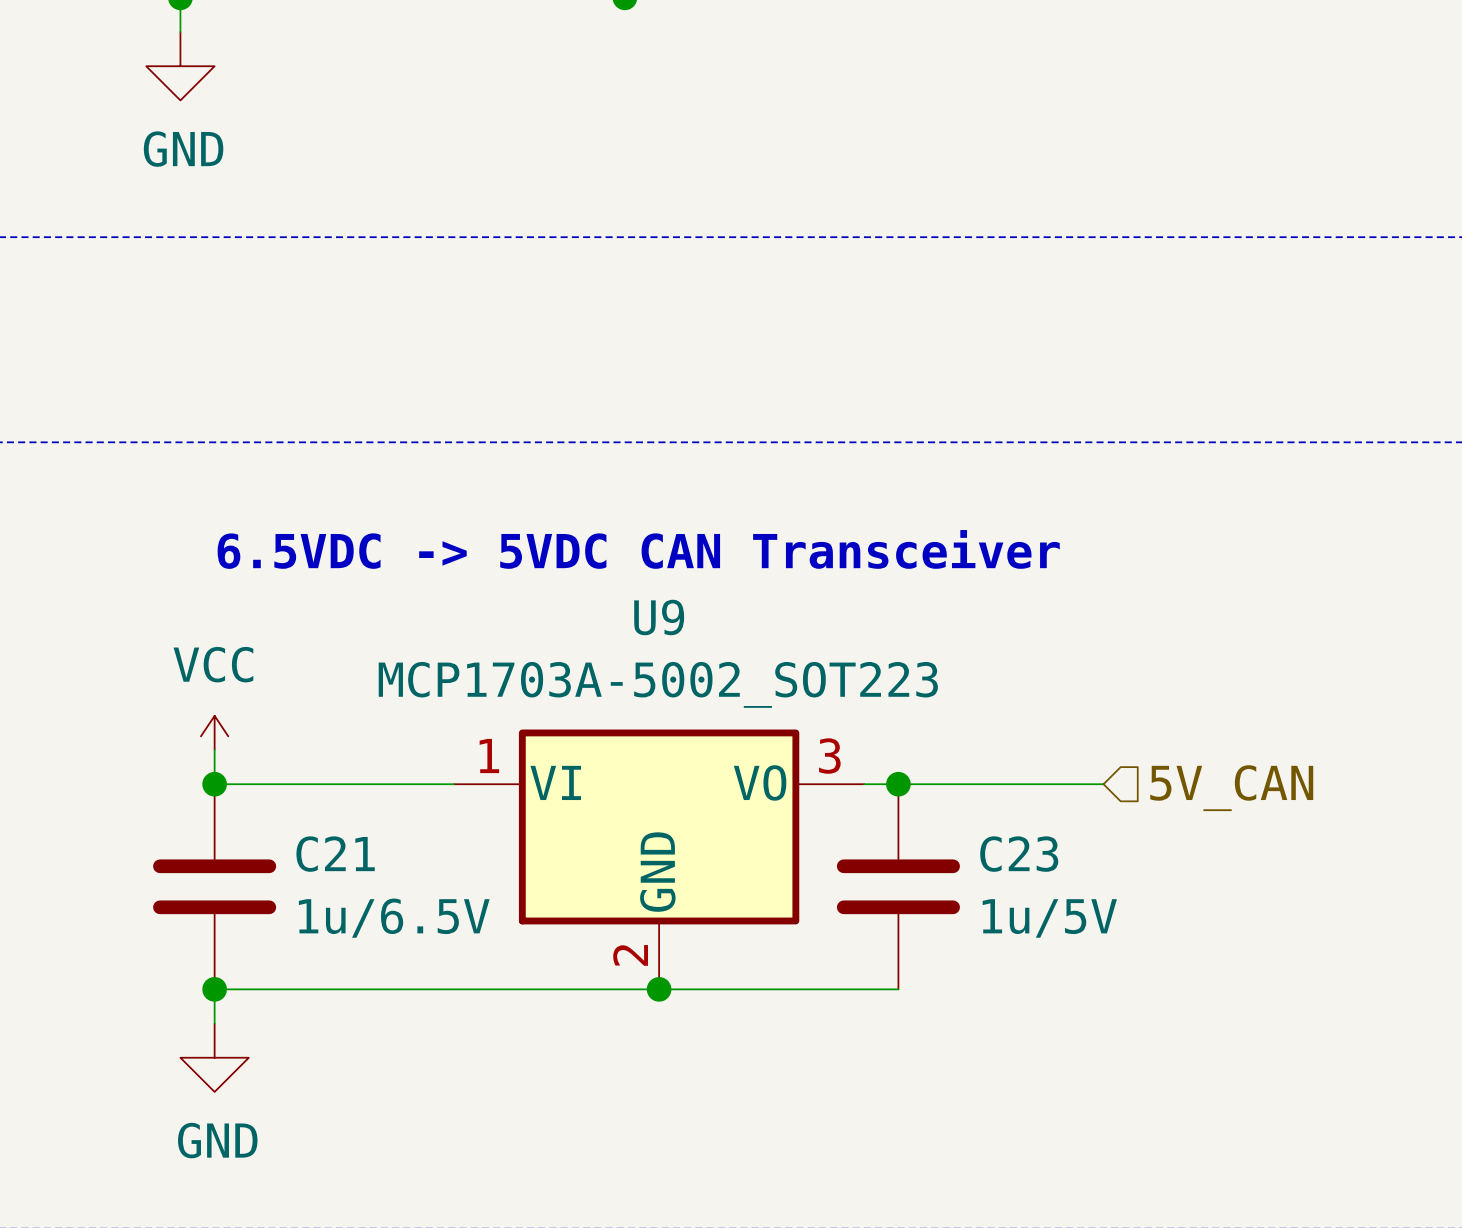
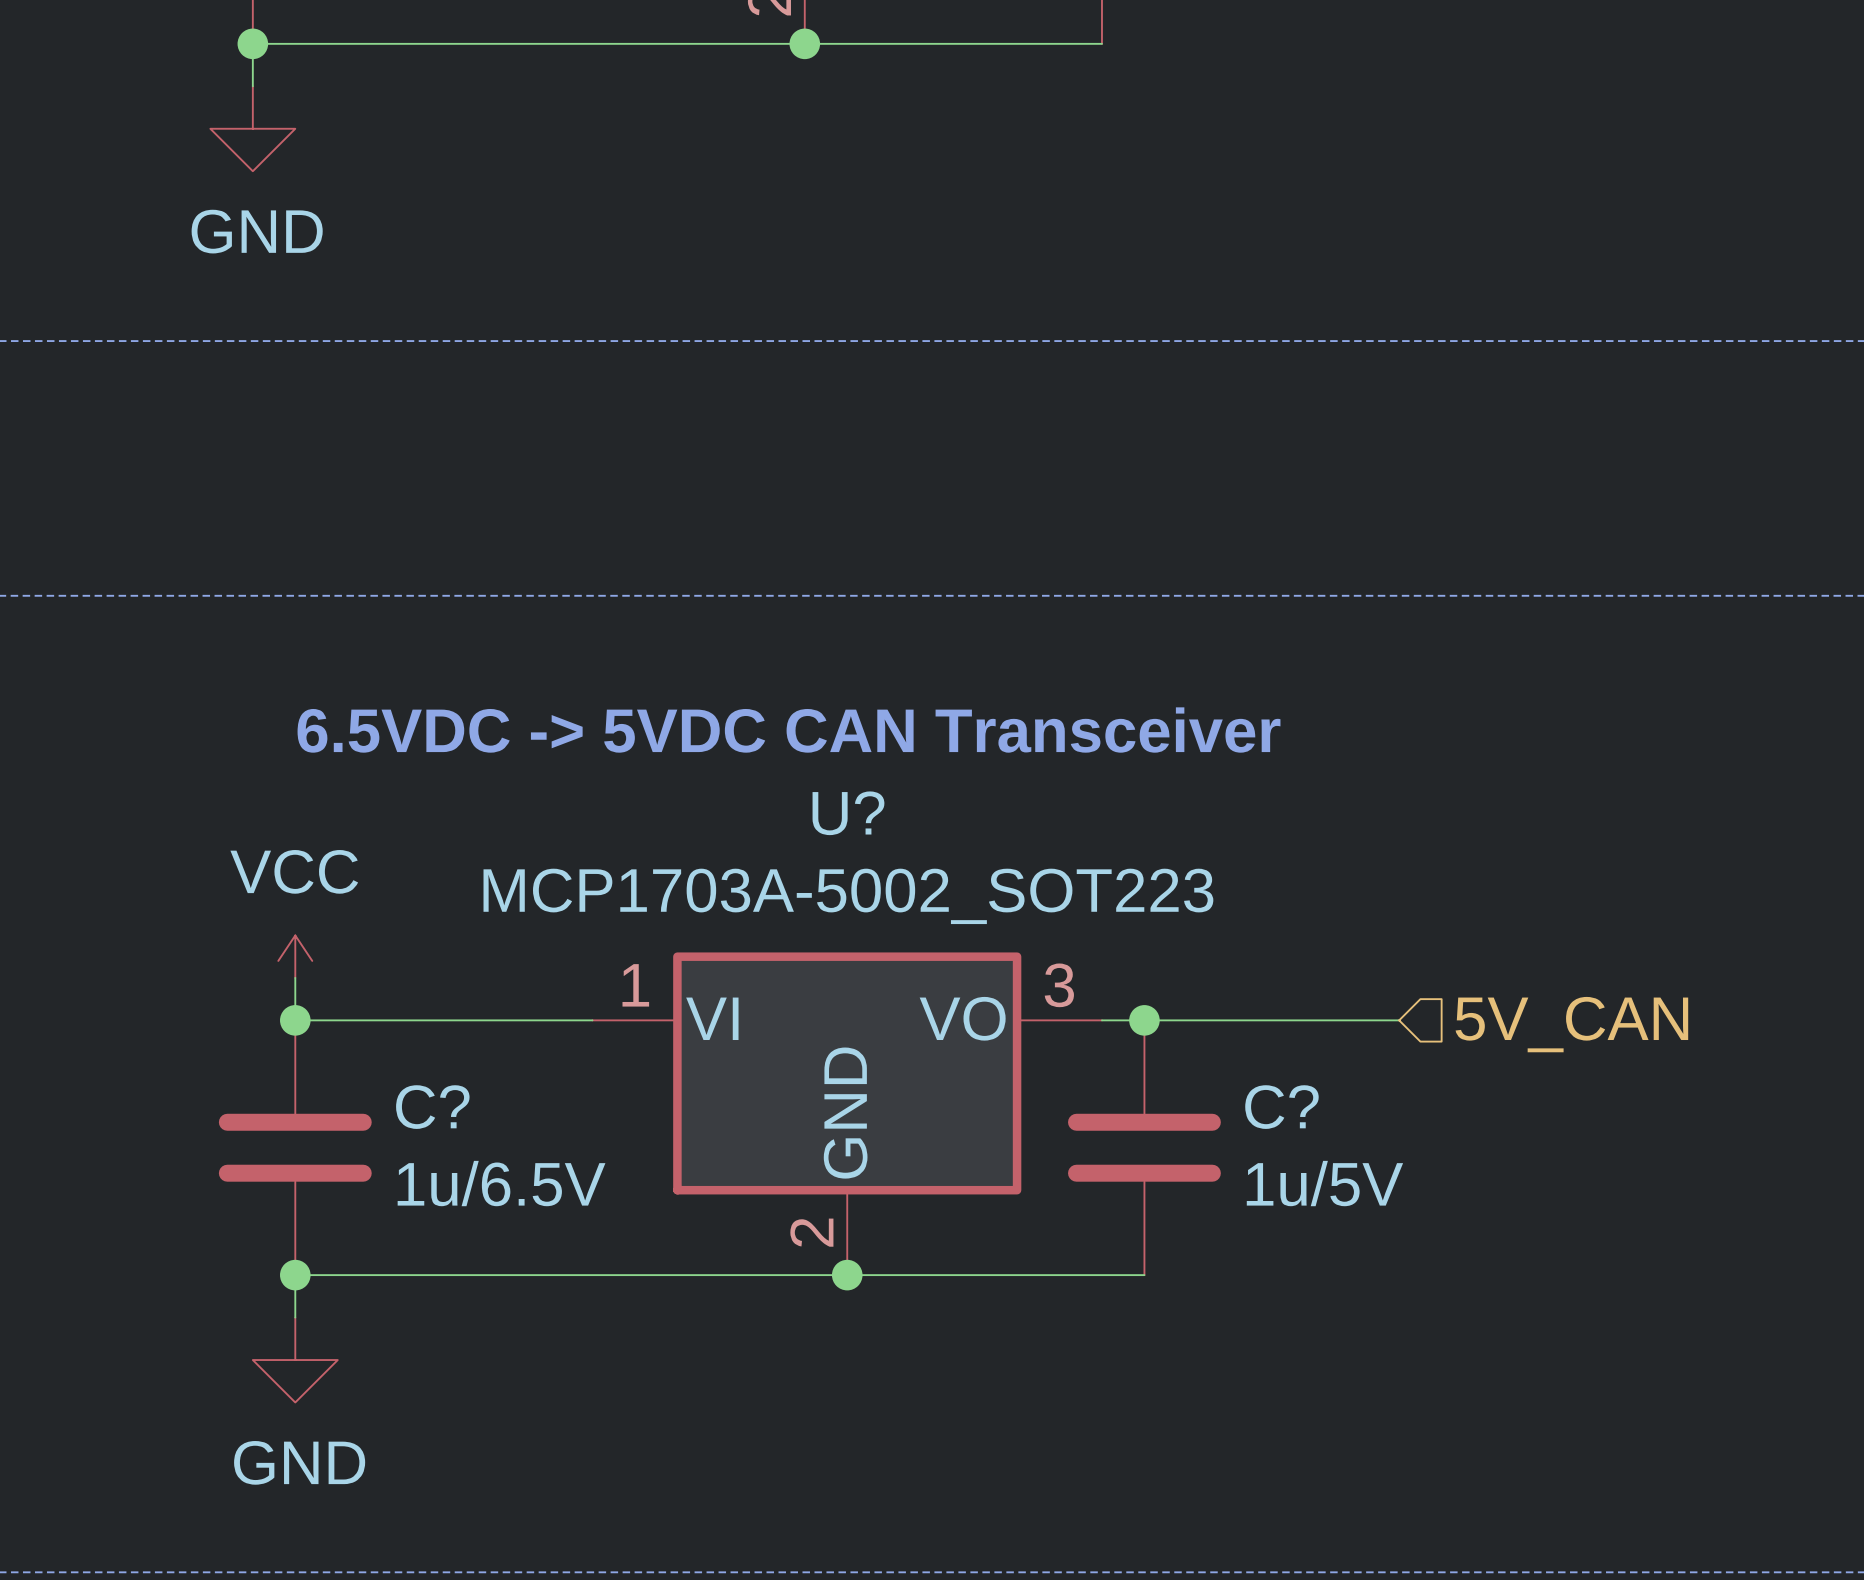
U9 name: U9 (659, 617) -> U? (848, 813)
C21 name: C21 (335, 854) -> C? (432, 1107)
C23 name: C23 (1019, 854) -> C? (1281, 1107)

